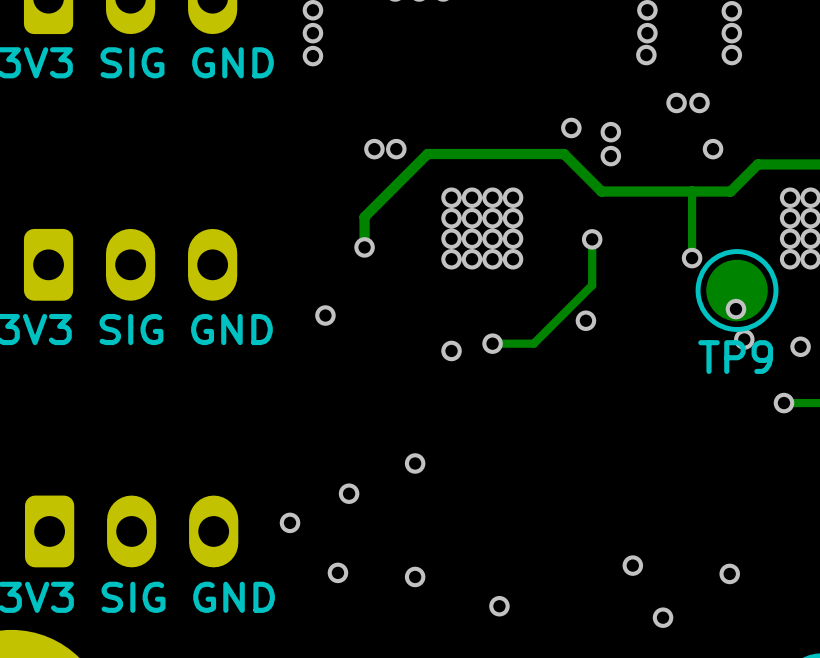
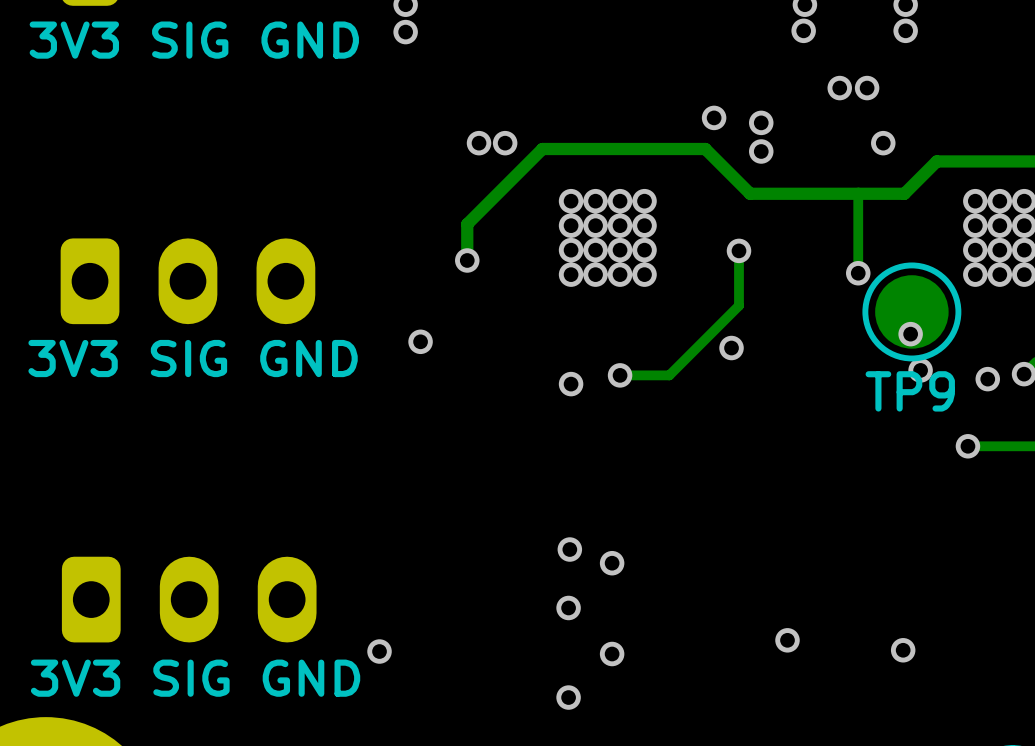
via: (415, 463) -> none
via: none -> (569, 549)
via: (349, 493) -> none
via: none -> (612, 563)
via: (290, 522) -> none
via: none -> (568, 607)
via: (337, 572) -> none
via: none -> (379, 651)
via: (415, 576) -> none
via: none -> (612, 654)
via: (499, 606) -> none
via: none -> (568, 697)
via: (663, 617) -> none

